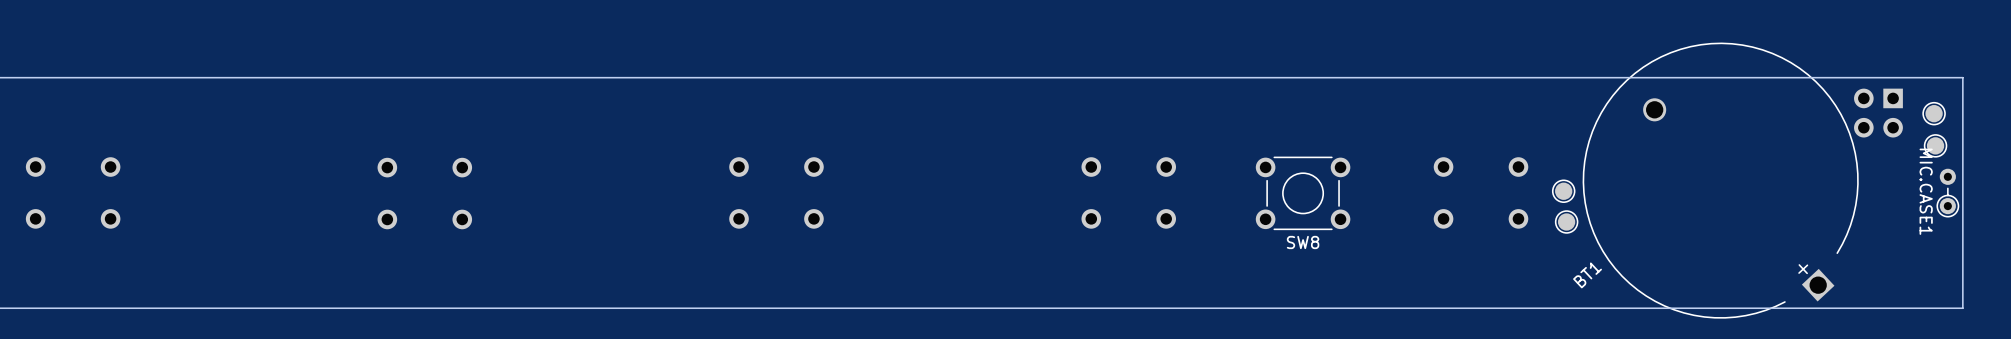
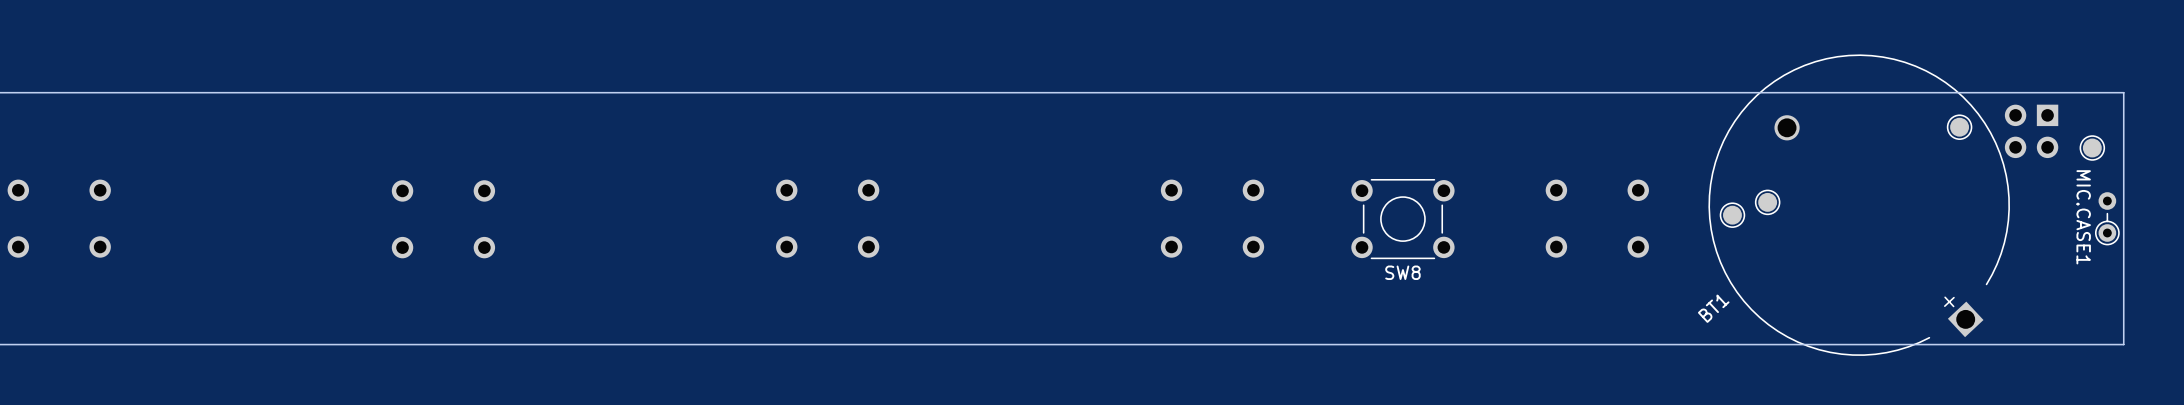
part: none -> (1959, 127)
part: (1934, 113) -> none
part: none -> (2092, 148)
part: (1935, 145) -> none
part: none -> (1767, 202)
part: none -> (1732, 215)
part: (1563, 191) -> none
part: (1566, 221) -> none

